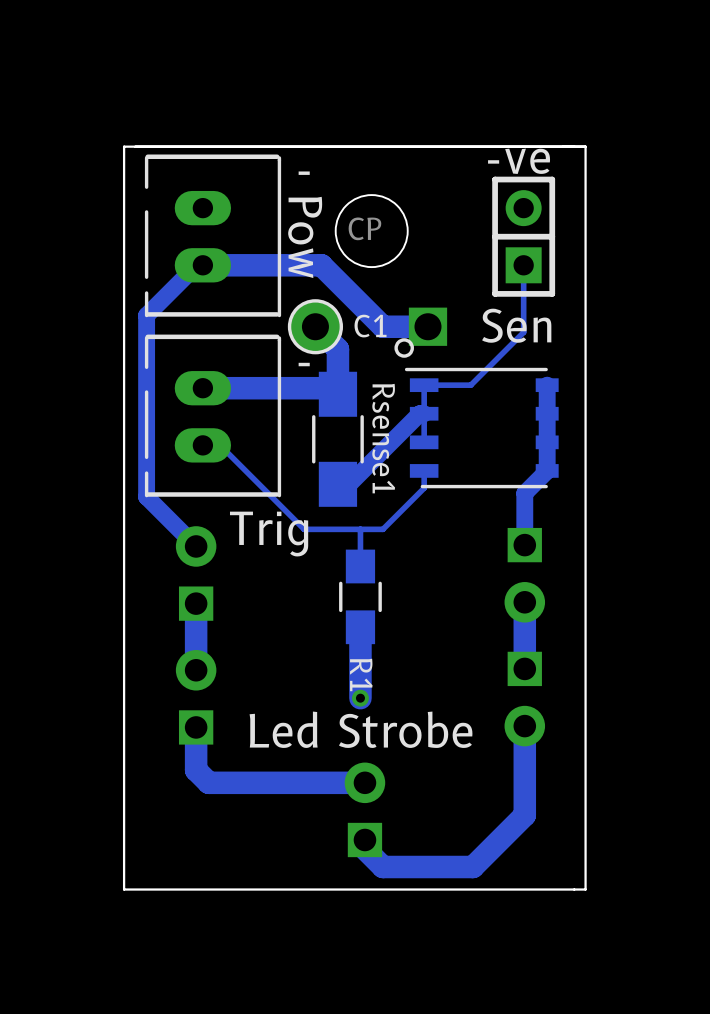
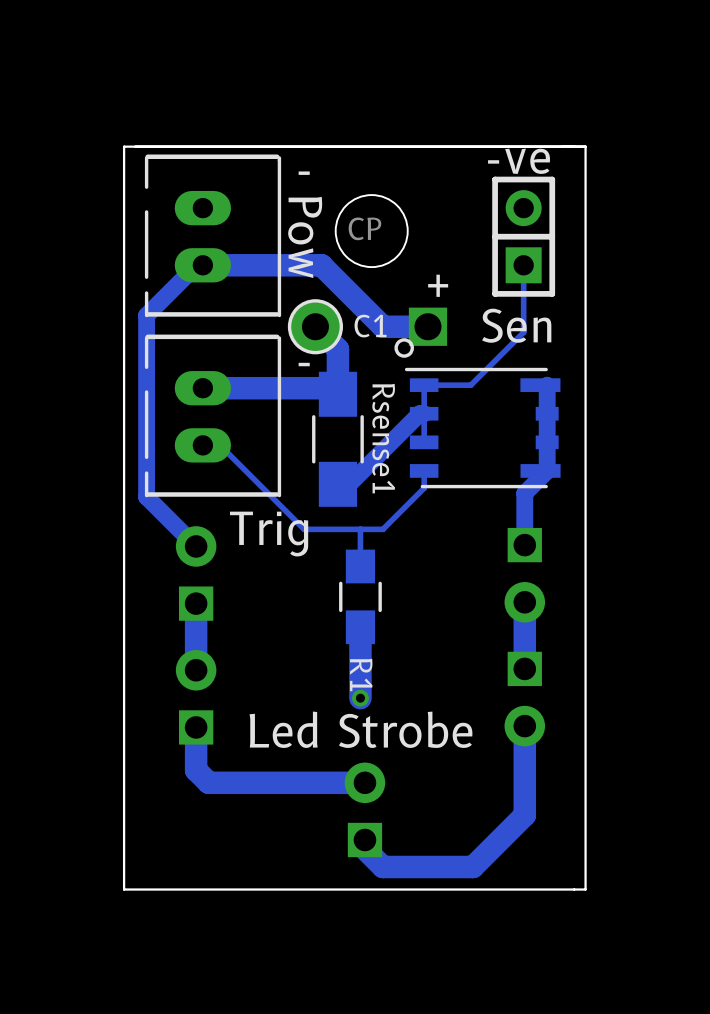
text: none -> + (438, 285)
part footprint: [394, 338, 559, 489] -> [394, 338, 561, 489]

